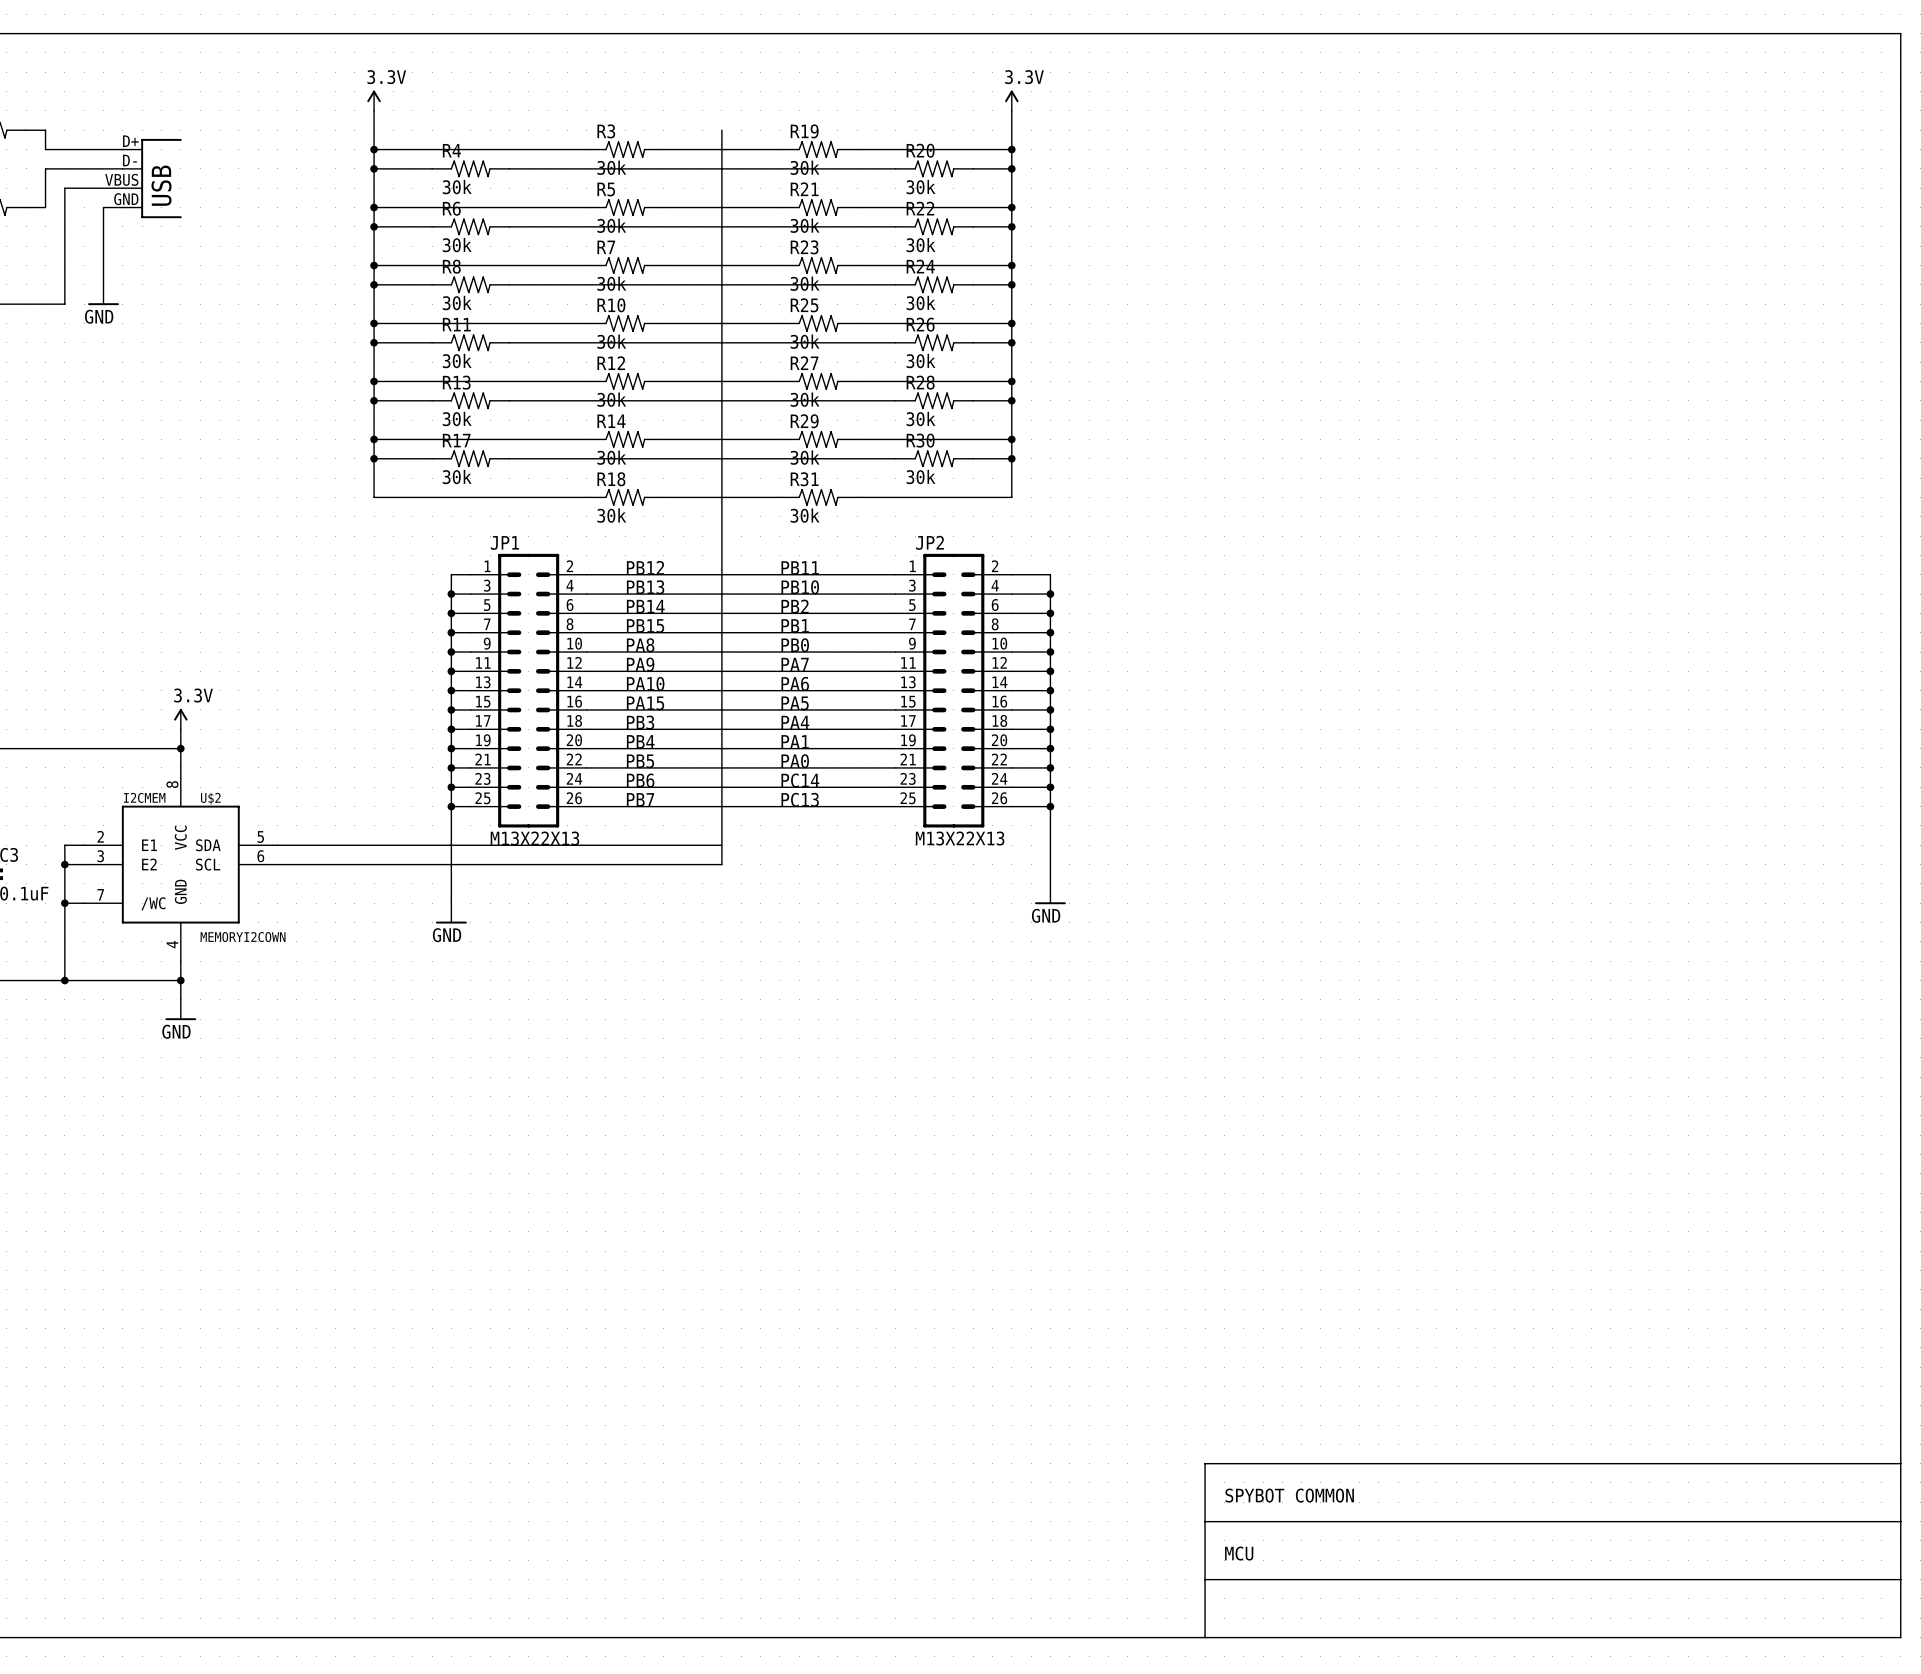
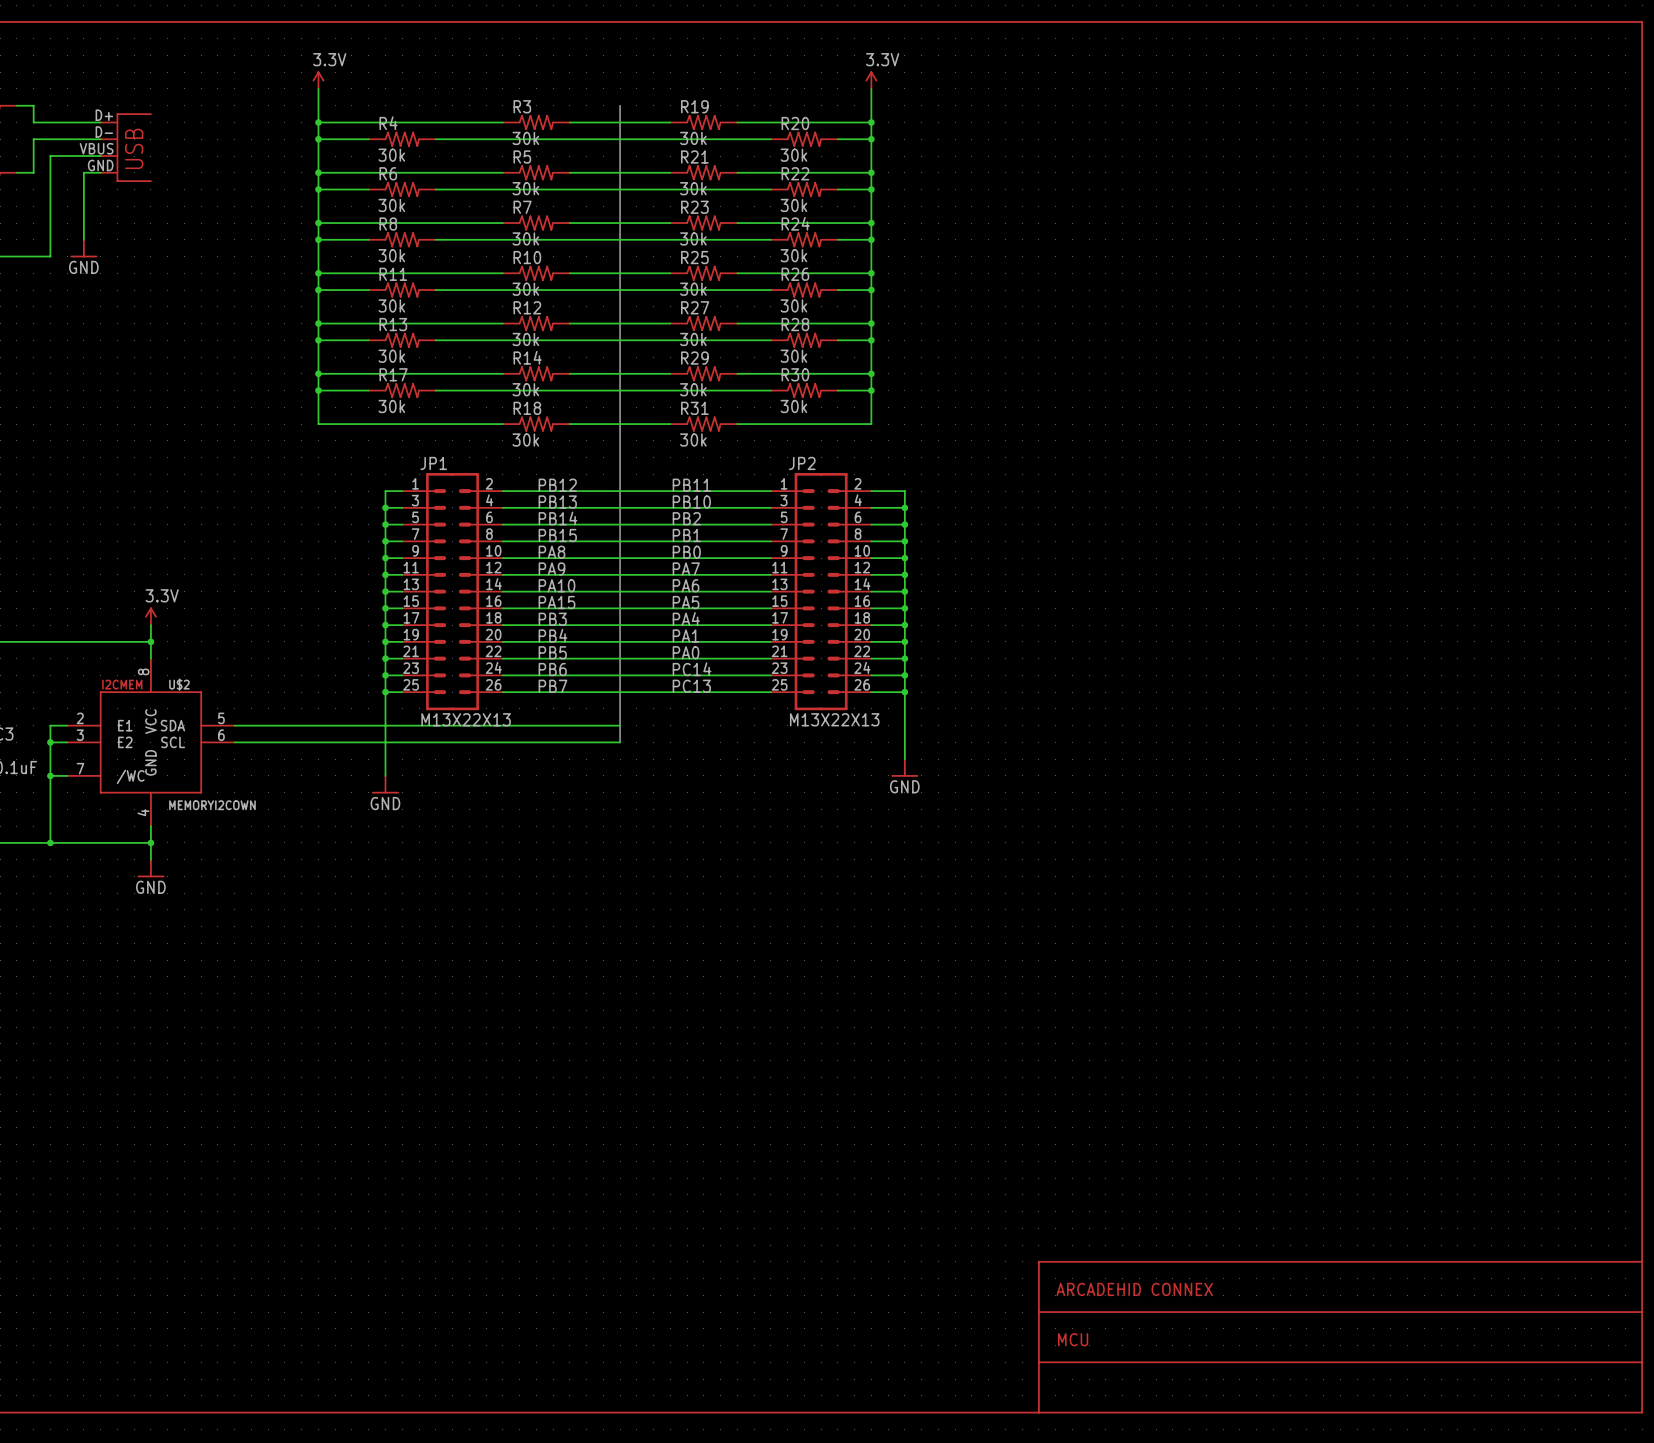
text: SPYBOT COMMON (1289, 1495) -> ARCADEHID CONNEX (1134, 1289)

